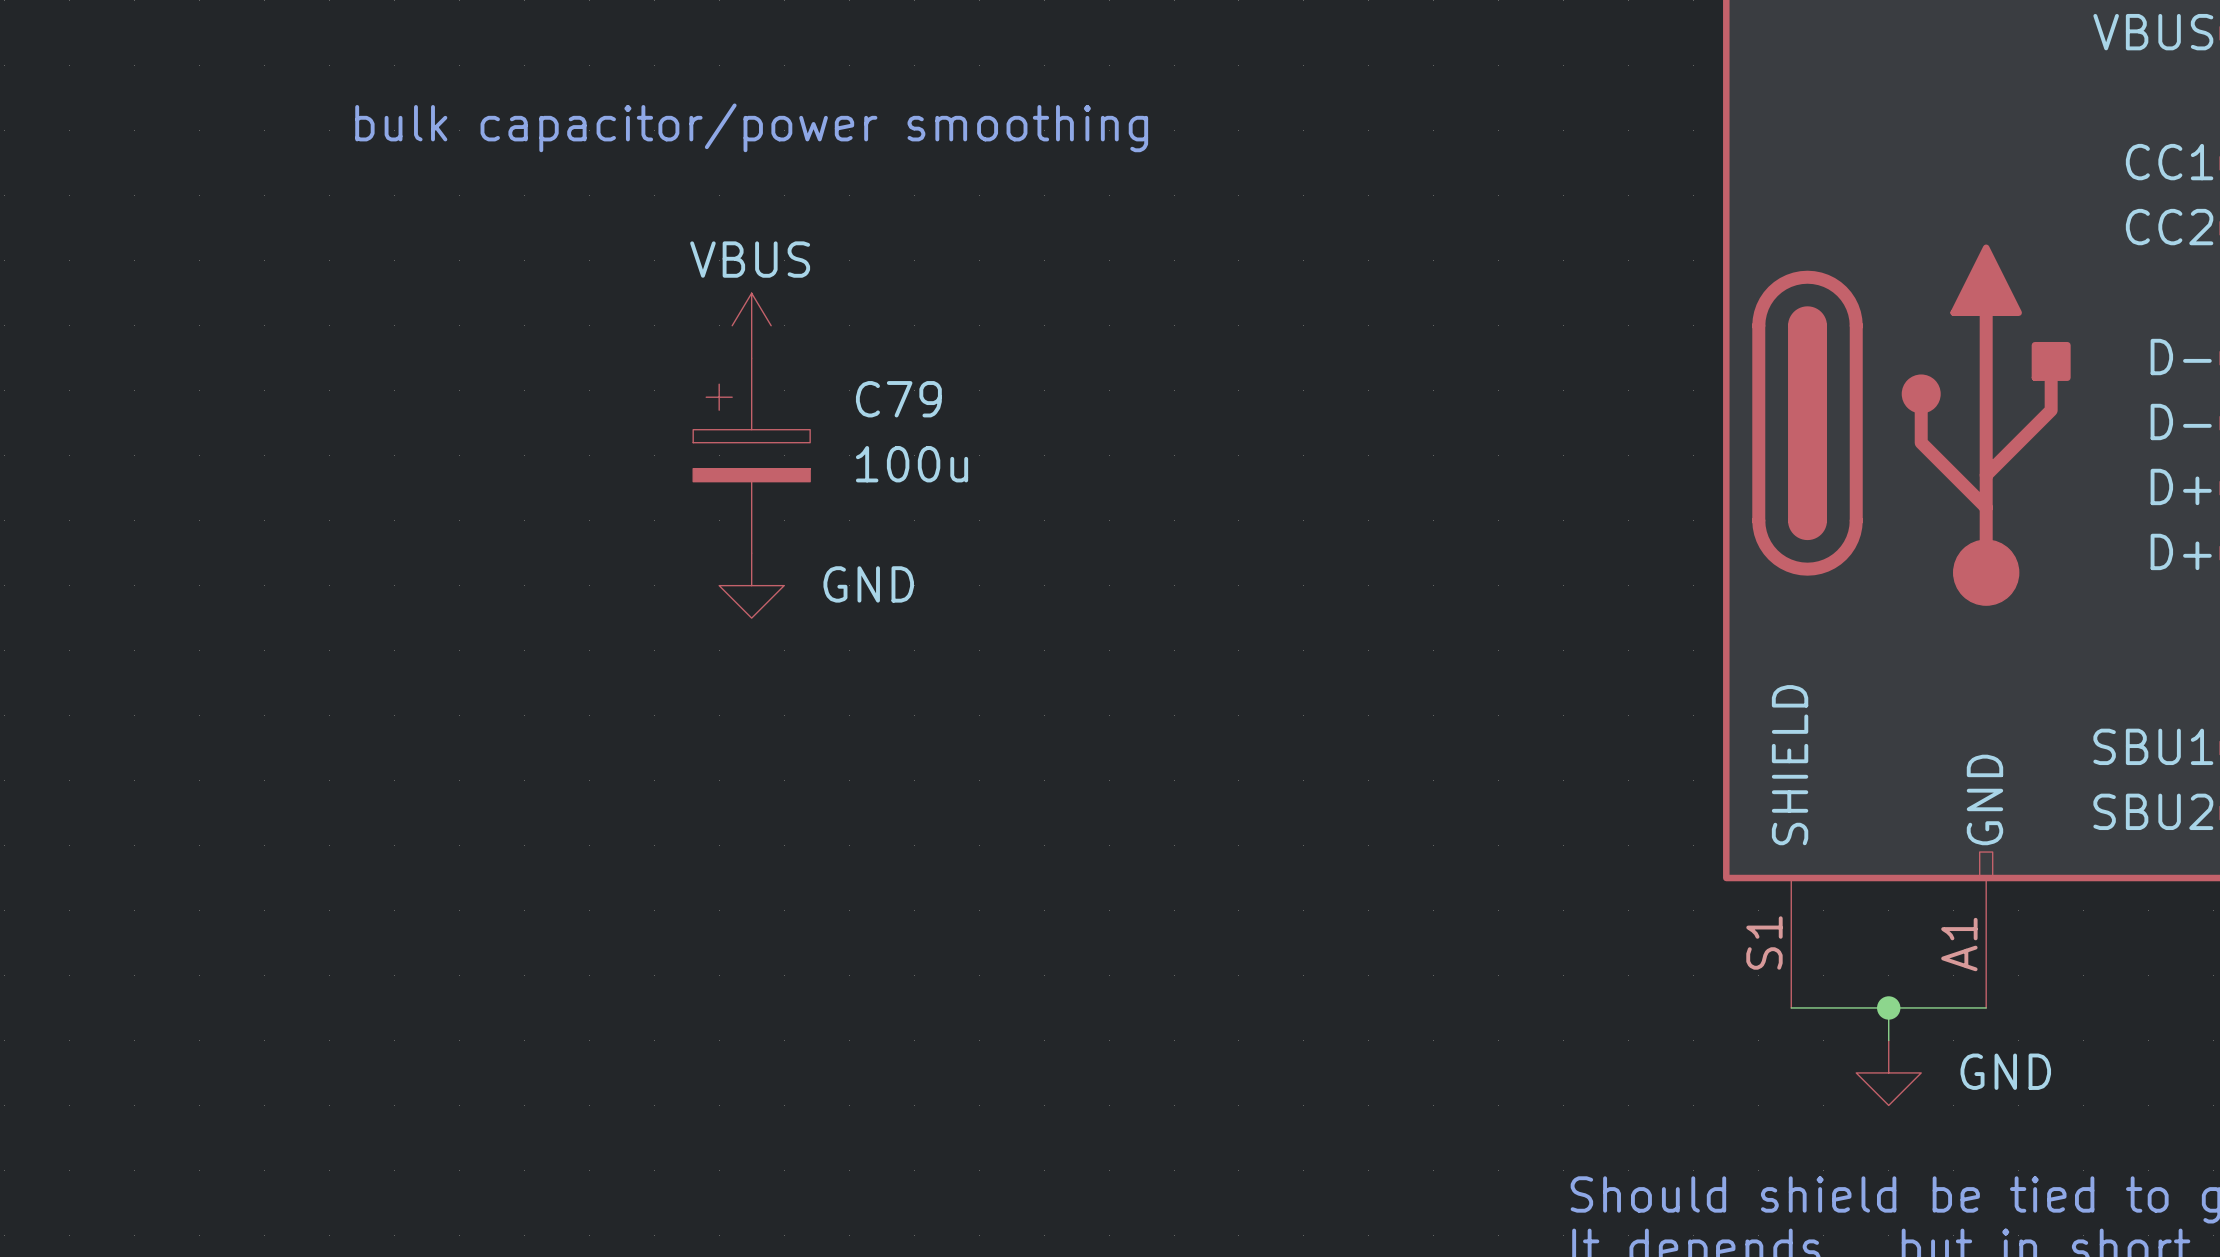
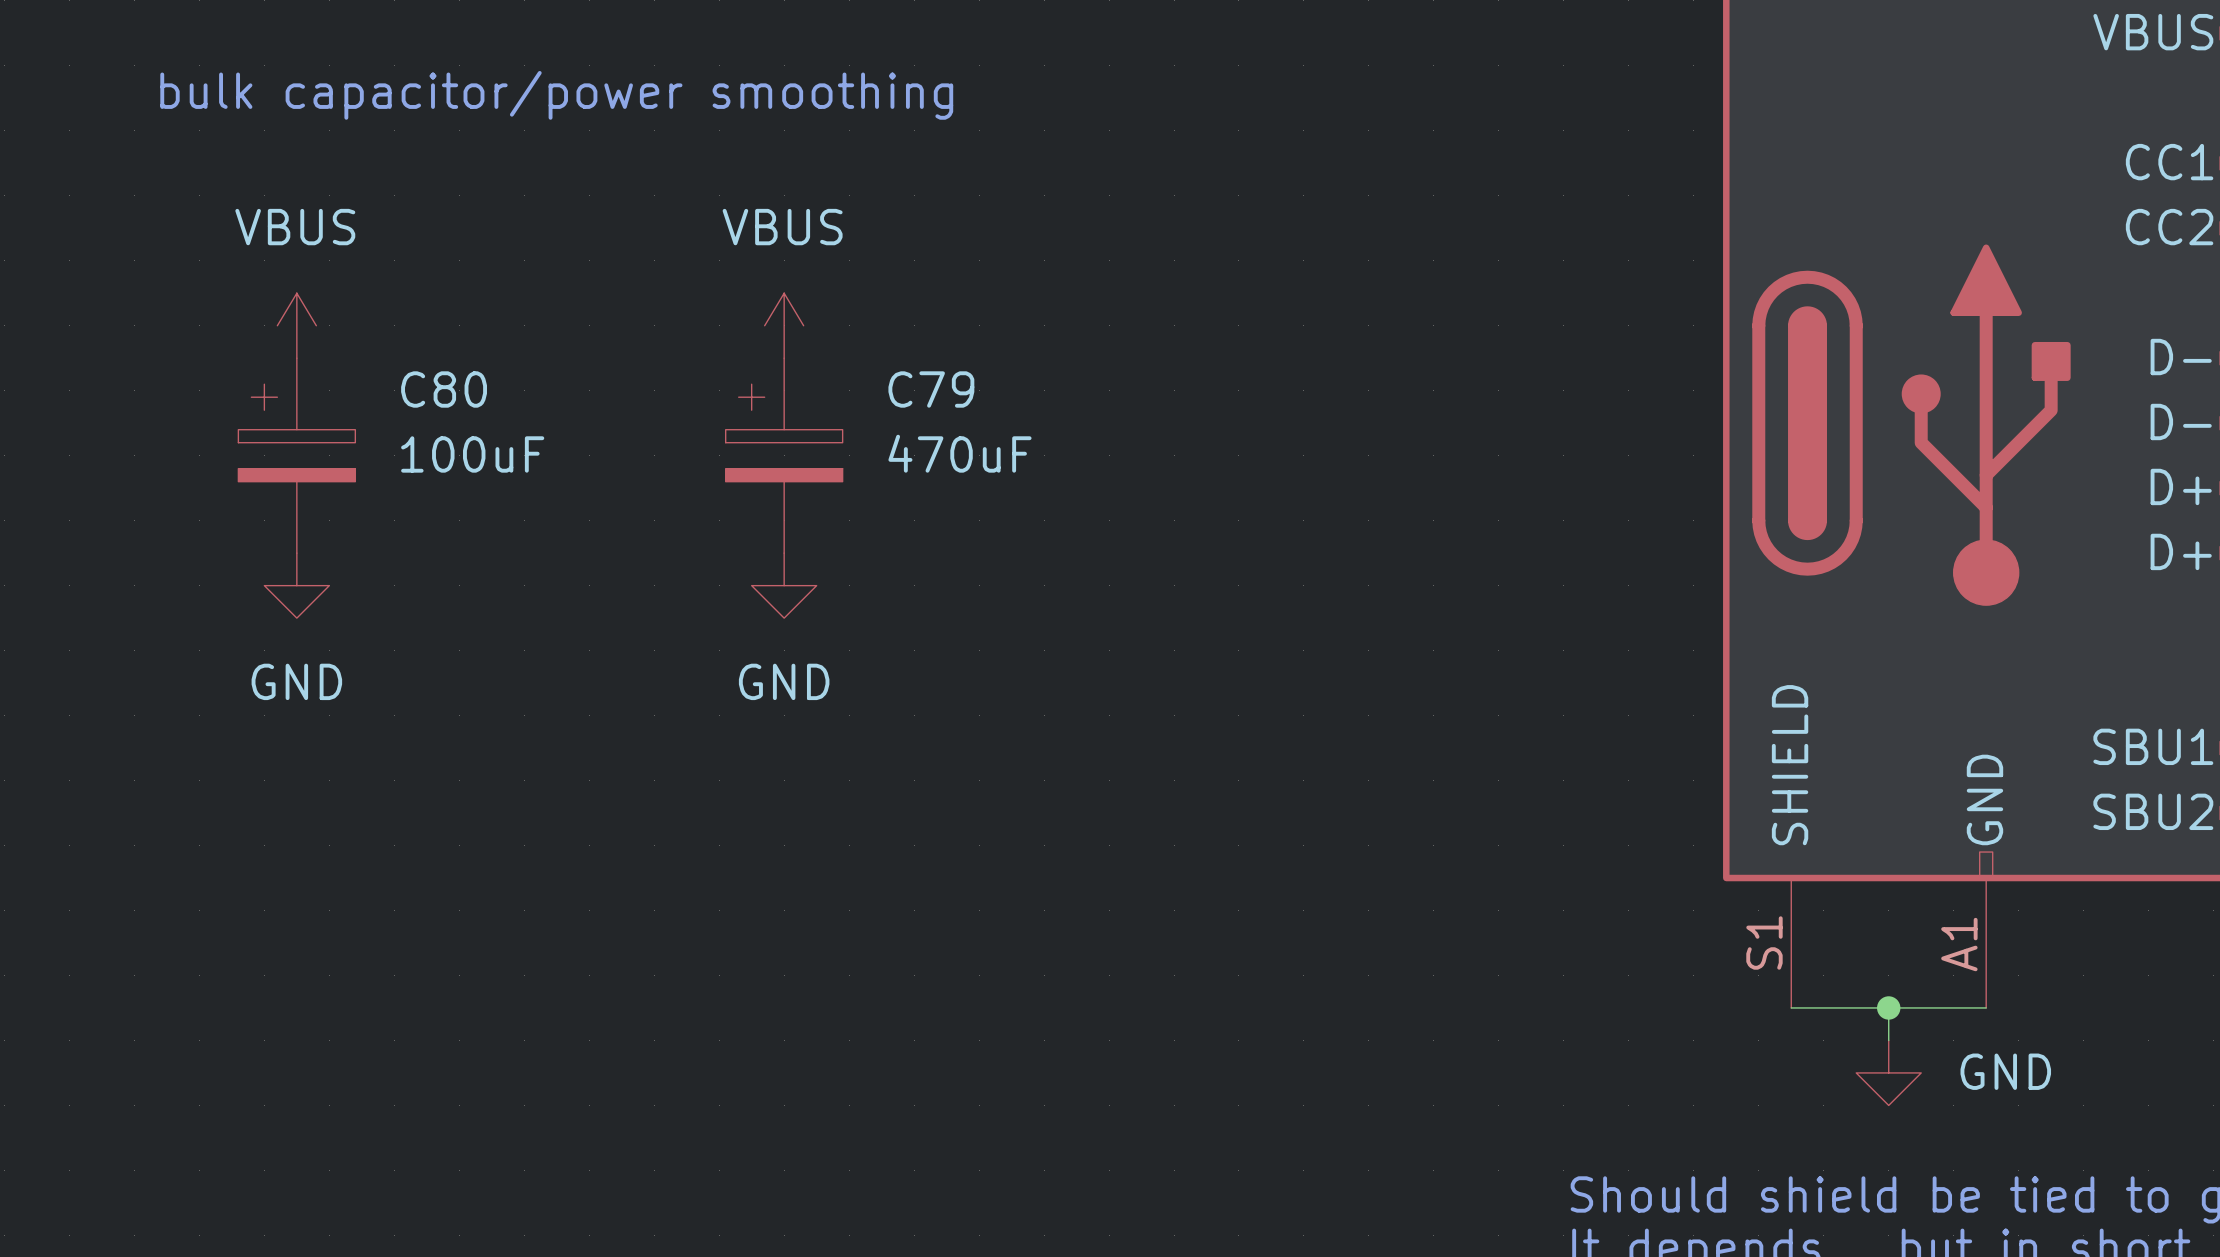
text position: bulk capacitor/power smoothing (751, 127) -> bulk capacitor/power smoothing (556, 95)
power symbol text position: VBUS (750, 259) -> VBUS (782, 227)
power symbol: none -> VBUS (296, 325)
power symbol position: VBUS (751, 325) -> VBUS (784, 325)
C79 name position: C79 (898, 399) -> C79 (931, 389)
C80: none -> 100uF (296, 455)
C79 position: (751, 455) -> (784, 455)
C79 value: 100u (912, 464) -> 470uF (959, 453)
power symbol text position: GND (868, 584) -> GND (784, 681)
power symbol: none -> GND (296, 585)
power symbol position: GND (751, 585) -> GND (784, 585)

